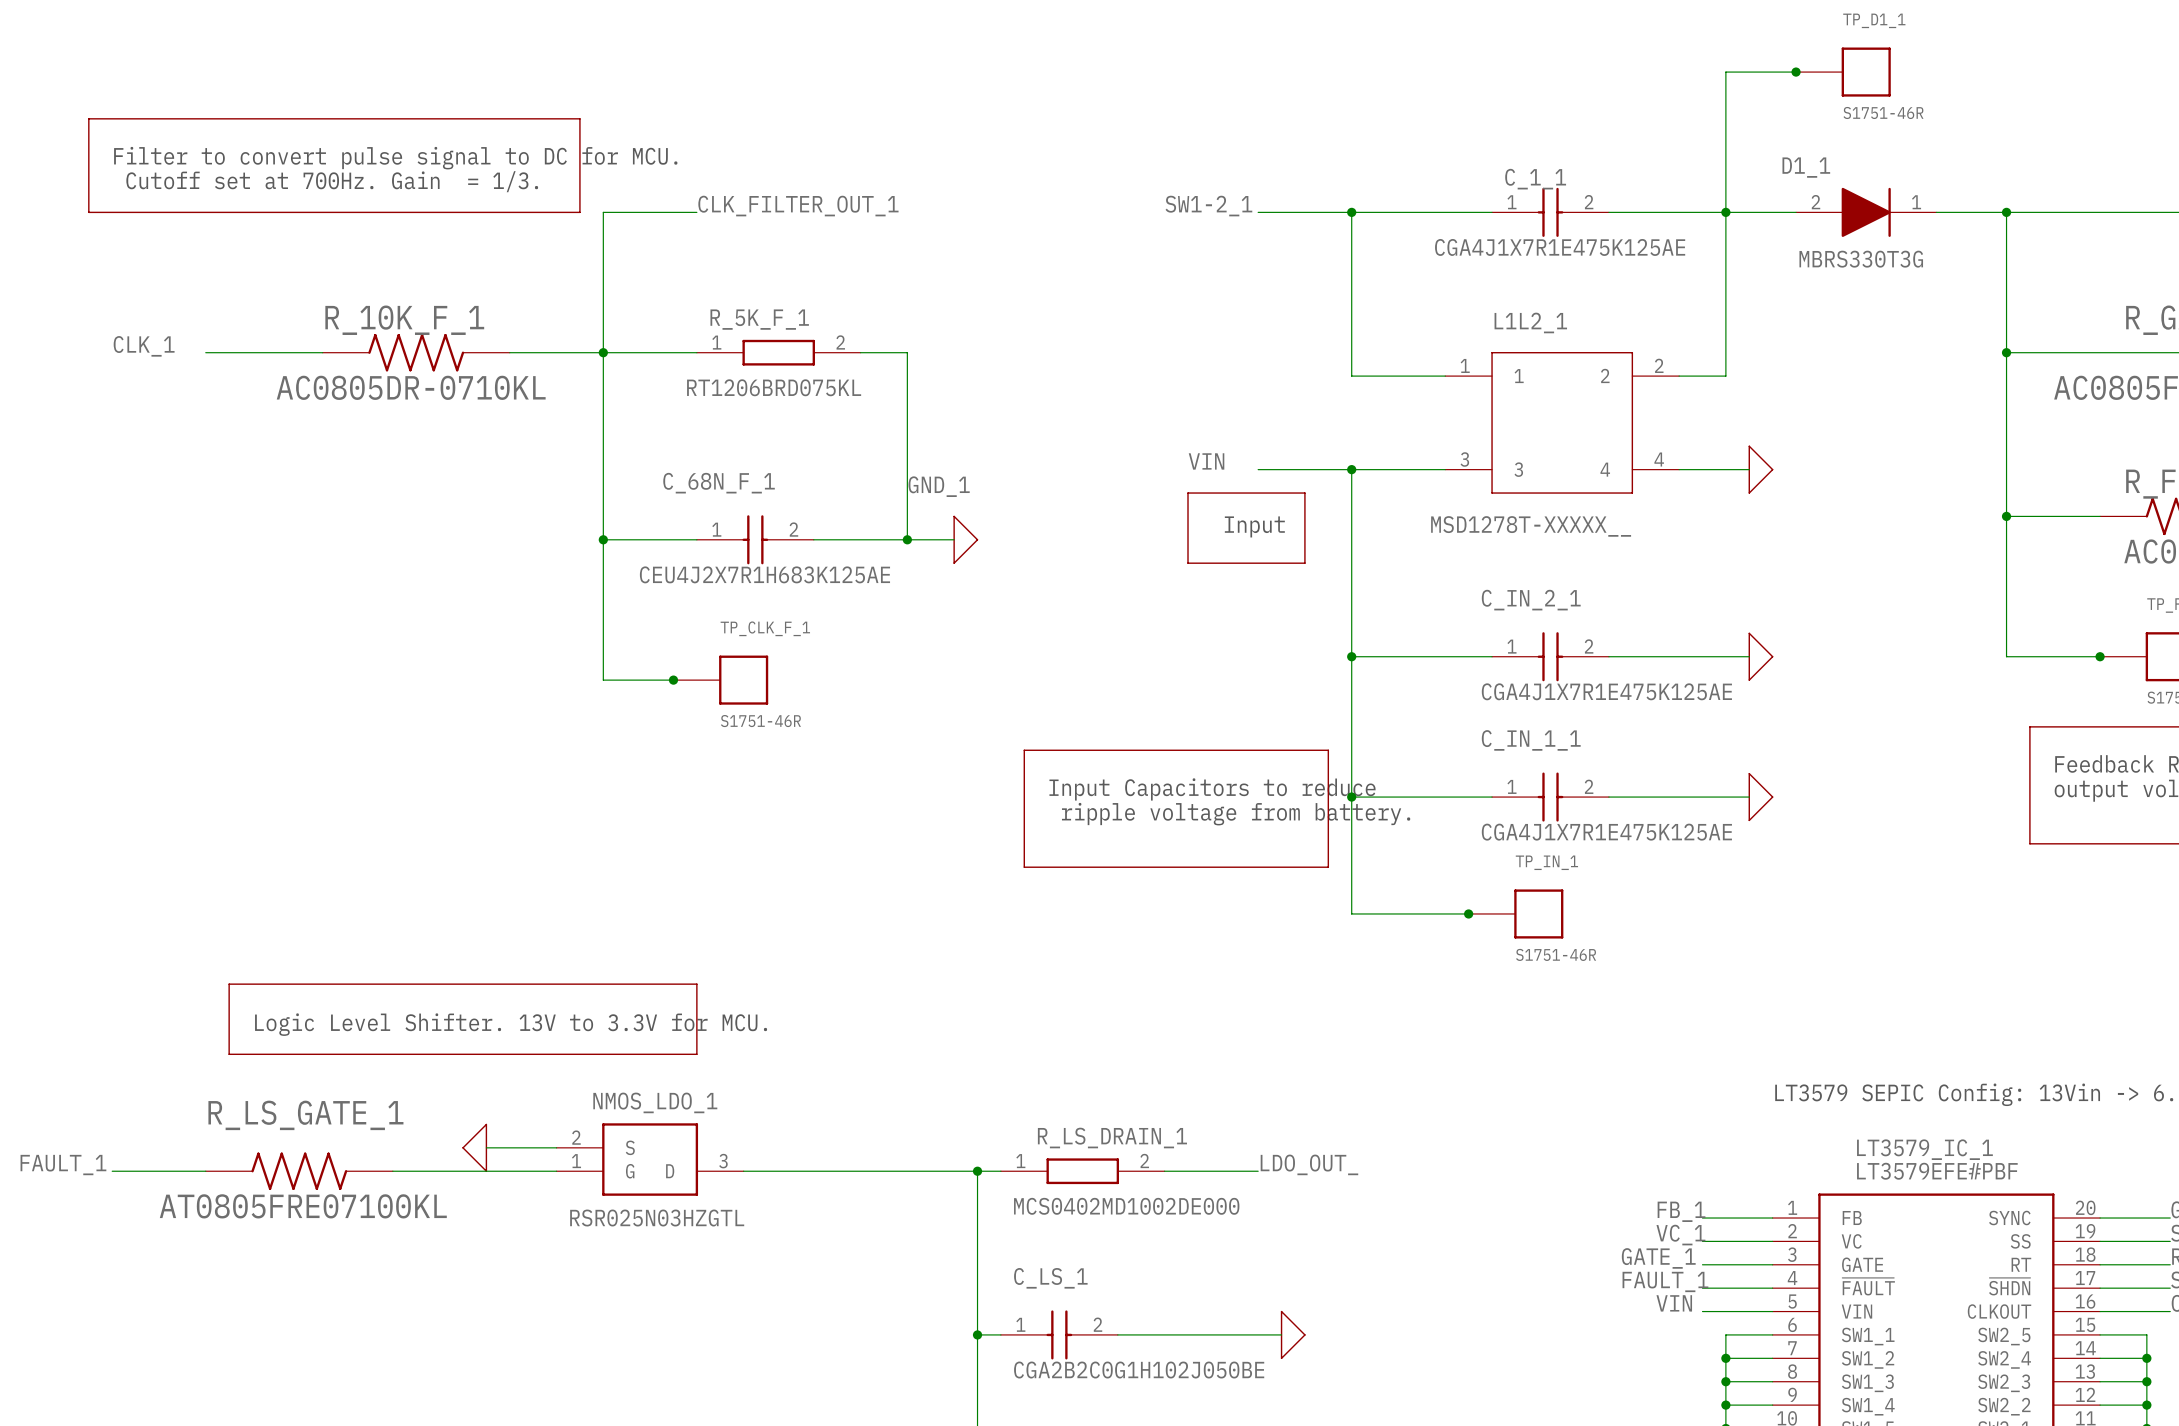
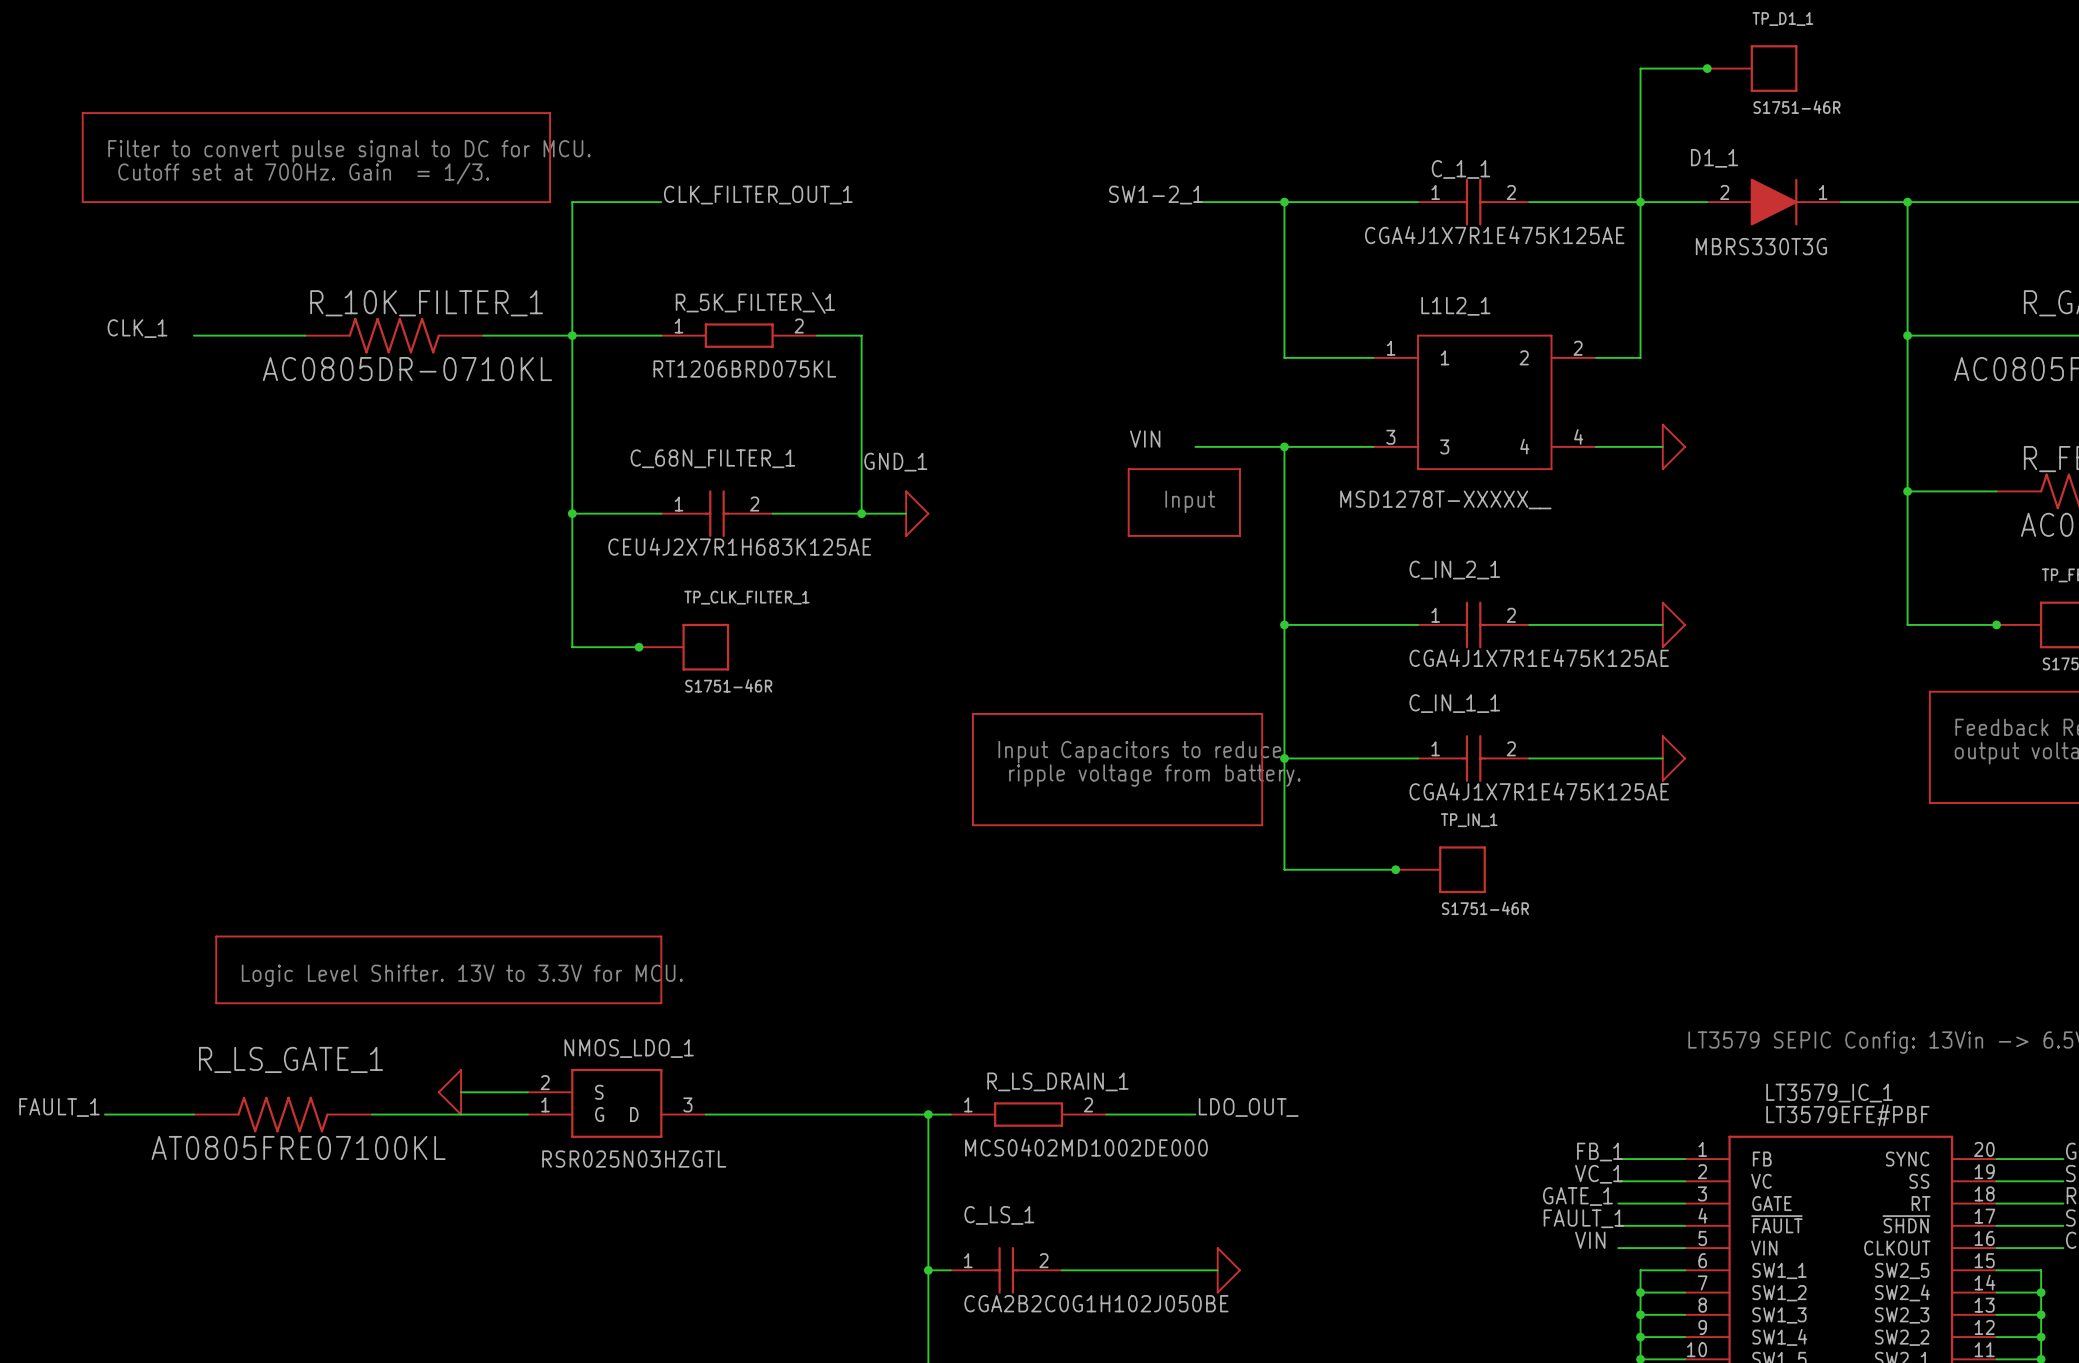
R_5K_F_1 name: R_5K_F_1 (759, 319) -> R_5K_FILTER_\1 (755, 302)
R_10K_F_1 name: R_10K_F_1 (404, 320) -> R_10K_FILTER_1 (426, 303)
C_68N_F_1 name: C_68N_F_1 (719, 483) -> C_68N_FILTER_1 (712, 458)
TP_CLK_F_1 name: TP_CLK_F_1 (765, 628) -> TP_CLK_FILTER_1 (746, 597)

